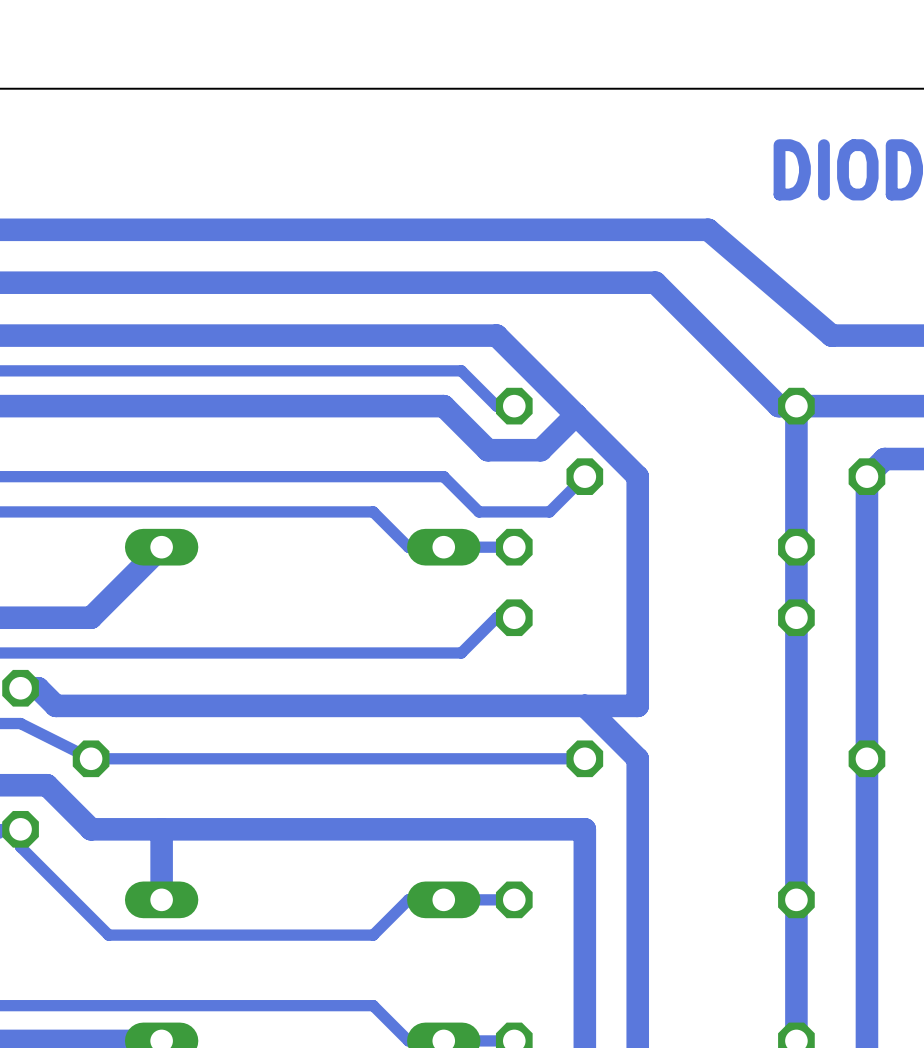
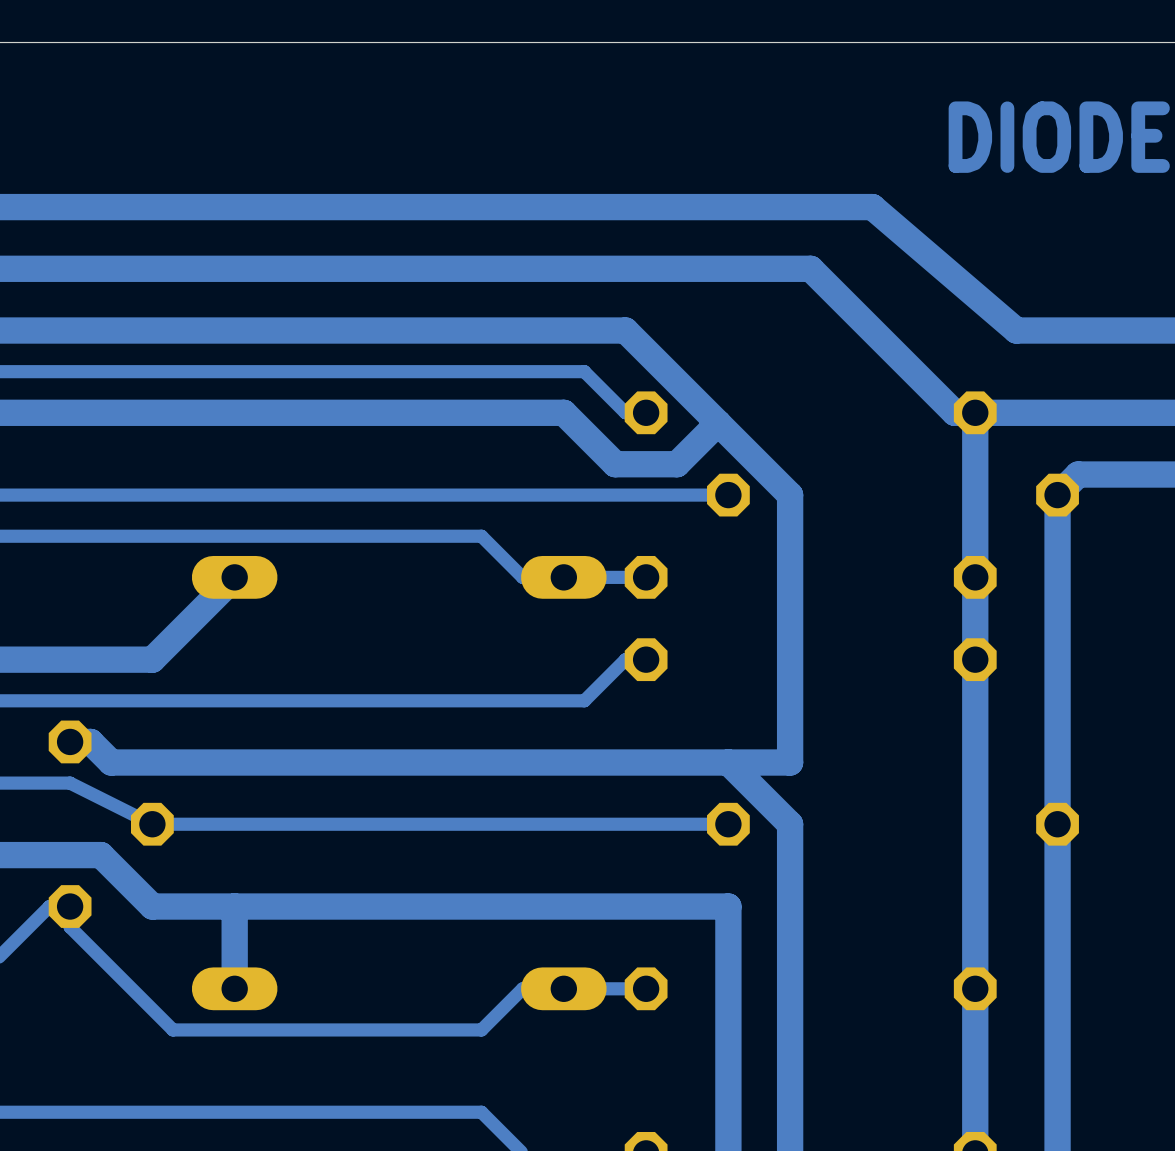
bottom track: (584, 476) (549, 511) (479, 511) (443, 476) -> (728, 495) (563, 495)

